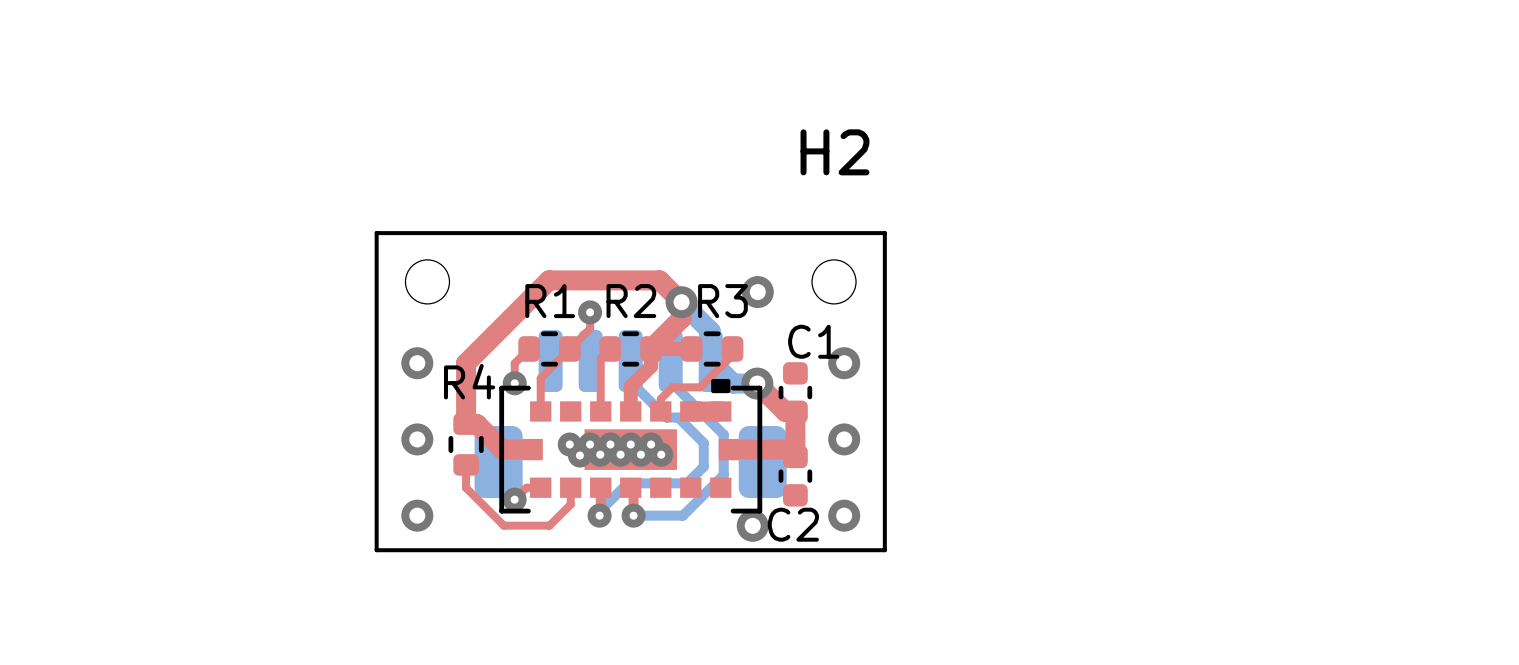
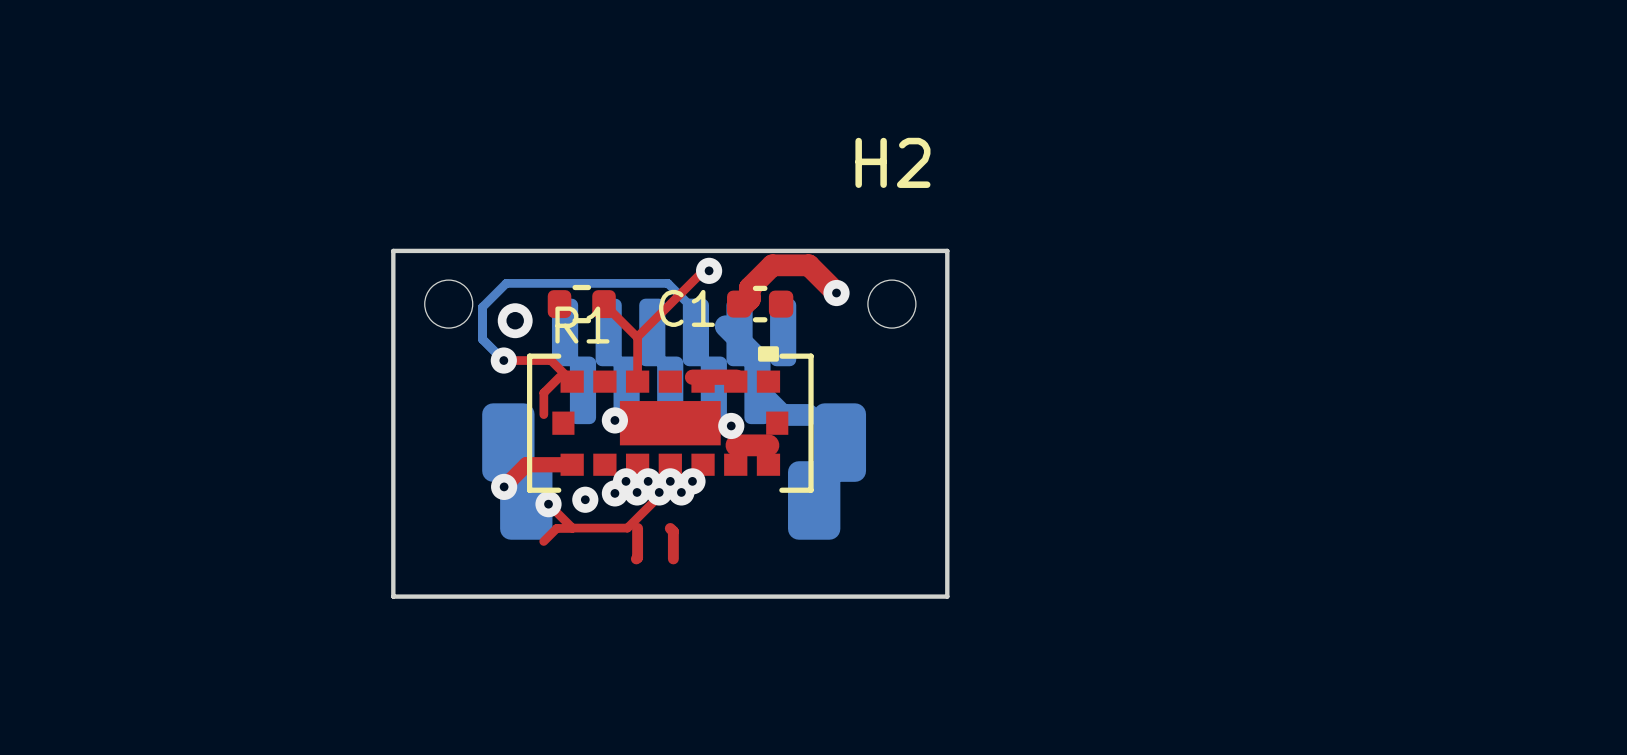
top track: none -> (709, 270) (703, 270) (637, 336) (637, 381)
via: none -> (709, 270)
top track: none -> (836, 293) (808, 265) (772, 265) (749, 287) (749, 298) (744, 304)
top track: none -> (604, 304) (637, 337)
via position: (757, 292) -> (836, 293)
via: none -> (515, 320)
via: (681, 302) -> none
bottom track: none -> (695, 332) (695, 311) (667, 283) (506, 283) (482, 307) (482, 339) (503, 360)
top track: (590, 312) (590, 328) (540, 378) (540, 411) -> none
via: (590, 312) -> none
top track: none -> (503, 360) (551, 360) (572, 381)
via: none -> (503, 360)
C1 name position: C1 (813, 341) -> C1 (686, 308)
R1 position: (549, 348) -> (581, 304)
top track: (610, 348) (600, 358) (600, 411) -> none
R2: (630, 348) -> none
R3: (712, 348) -> none
top track: (738, 348) (700, 387) (672, 387) (660, 399) (660, 411) -> none
part: none -> (674, 390)
bottom track: (630, 361) (630, 381) (666, 417) (678, 417) (703, 443) (703, 466) (687, 483) (627, 483) (599, 511) (599, 515) -> none
bottom track: (670, 361) (670, 381) (723, 434) (723, 474) (683, 515) (633, 515) -> none
via: (417, 363) -> none
via: (844, 363) -> none
via: (514, 383) -> none
top track: (757, 383) (785, 411) (795, 411) (795, 456) (788, 449) (728, 449) -> none
via: (757, 383) -> none
via: none -> (614, 420)
C1 rotation: 0° (795, 392) -> 90° clockwise (760, 304)
C1 position: (795, 392) -> (760, 304)
via: none -> (731, 425)
top track: (630, 408) (630, 386) (651, 366) (651, 348) (681, 318) (681, 302) (659, 280) (548, 280) (466, 363) (466, 424) (477, 424) (502, 449) (532, 449) -> none
top track: none -> (572, 464) (526, 464) (504, 486)
top track: none -> (670, 464) (670, 485) (627, 528) (572, 528) (548, 504)
via: (417, 439) -> none
via: (844, 439) -> none
R4: (466, 444) -> none
via position: (569, 444) -> (585, 499)
part position: (630, 446) -> (670, 419)
via: none -> (504, 486)
via: (661, 454) -> none
top track: (466, 464) (466, 487) (503, 525) (549, 525) (570, 504) (570, 487) -> none
via: none -> (548, 504)
C2: (795, 476) -> none
via: (514, 499) -> none
via: (417, 515) -> none
via: (599, 515) -> none
via: (633, 515) -> none
via: (844, 515) -> none
via: (752, 525) -> none

